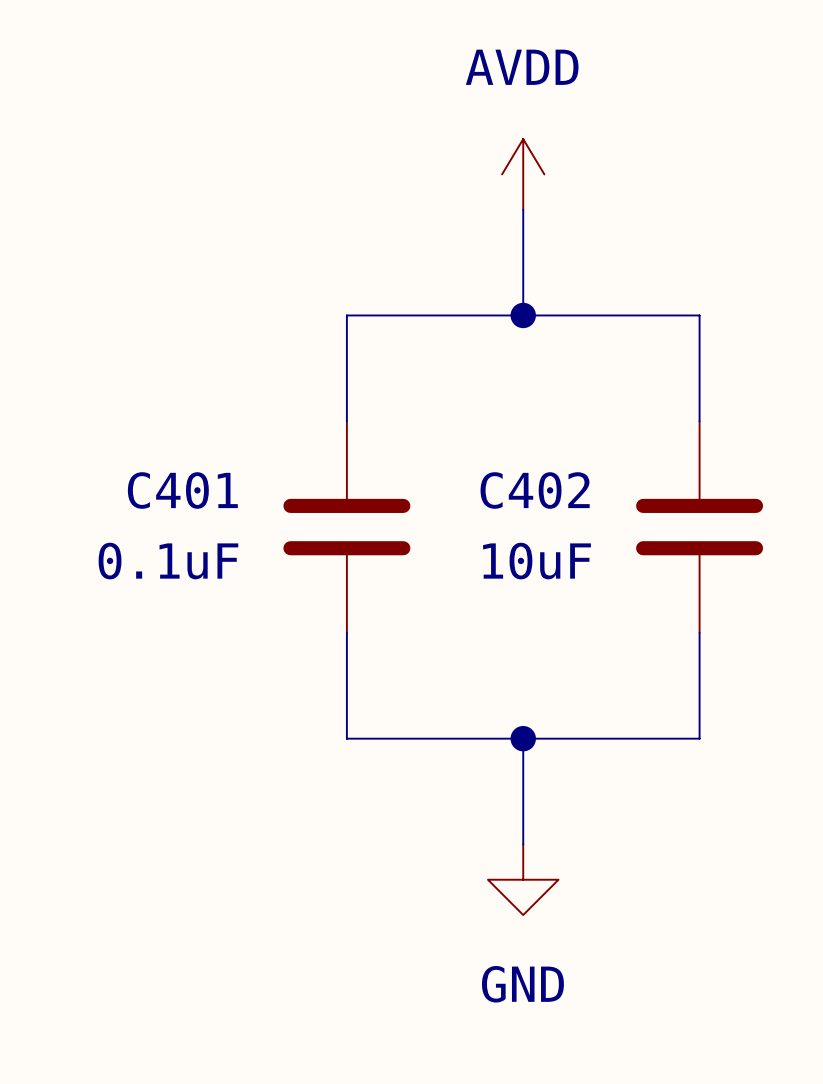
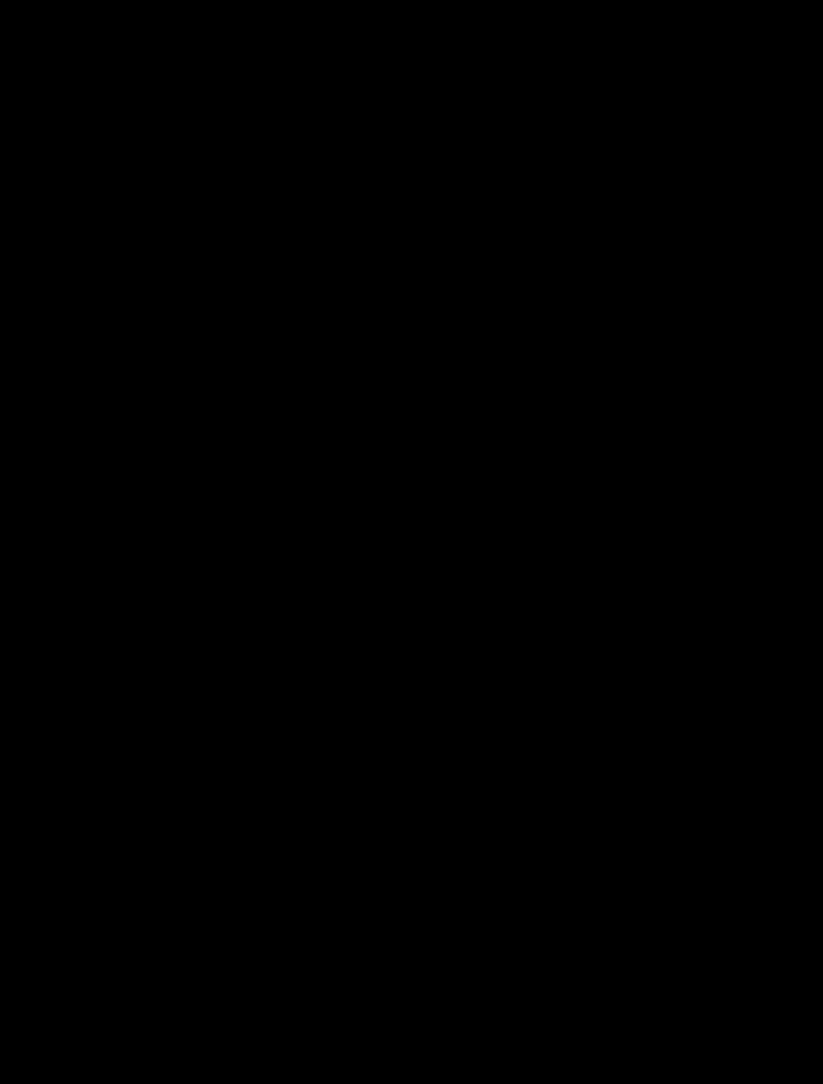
power symbol: AVDD (523, 174) -> none
wire: (523, 209) (523, 315) -> none
junction: (523, 315) -> none
wire: (346, 421) (346, 315) (699, 315) (699, 421) -> none
C401: 0.1uF (346, 527) -> none
C402: 10uF (699, 527) -> none
wire: (346, 632) (346, 738) (699, 738) (699, 632) -> none
wire: (523, 738) (523, 844) -> none
junction: (523, 738) -> none
power symbol: GND (523, 879) -> none

